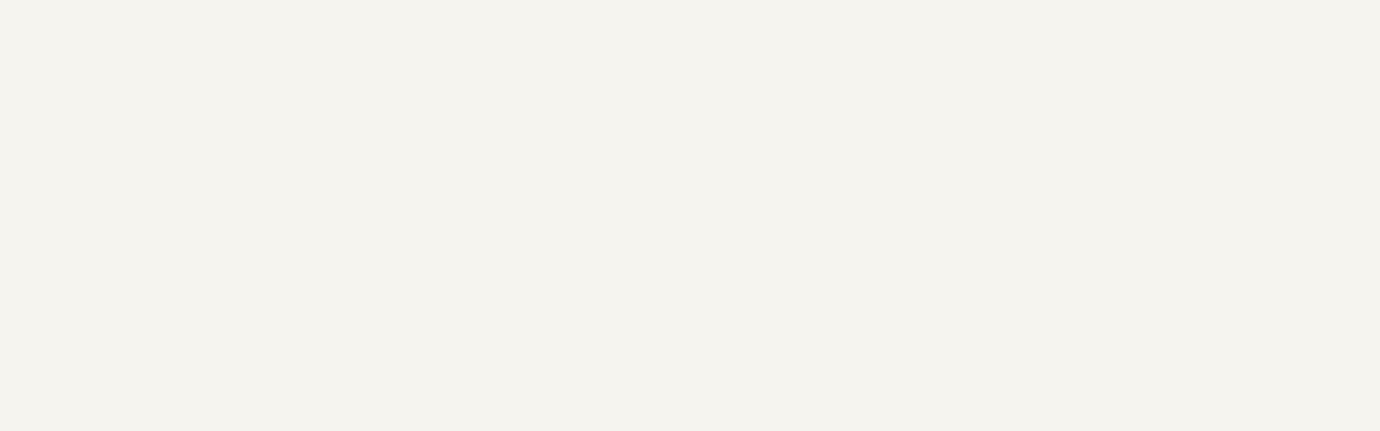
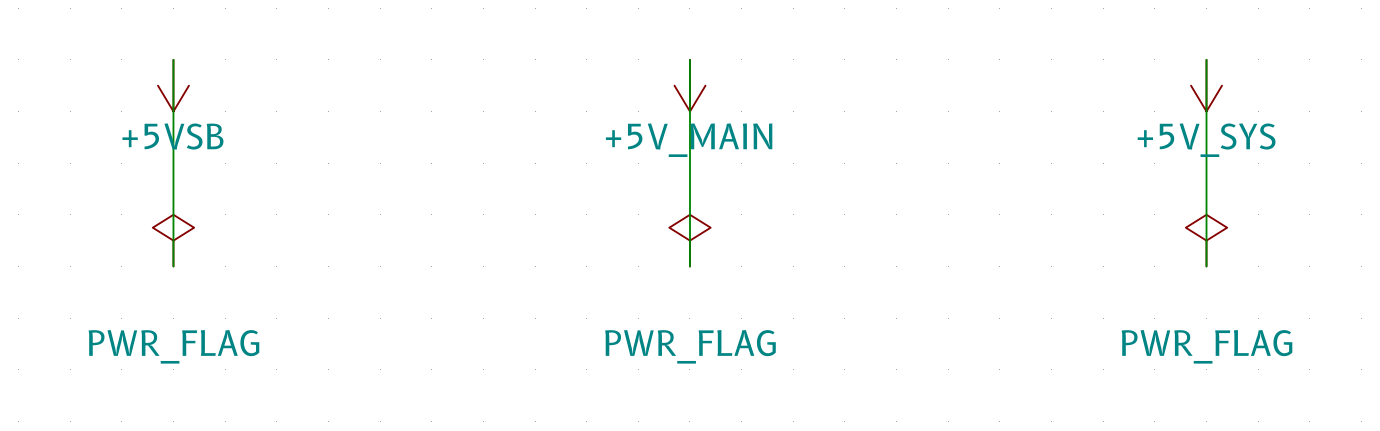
wire: none -> (173, 59) (173, 266)
wire: none -> (689, 59) (689, 266)
wire: none -> (1206, 59) (1206, 266)
power symbol: none -> +5VSB (173, 85)
power symbol: none -> +5V_MAIN (689, 85)
power symbol: none -> +5V_SYS (1206, 85)
power symbol: none -> PWR_FLAG (173, 240)
power symbol: none -> PWR_FLAG (689, 240)
power symbol: none -> PWR_FLAG (1206, 240)

